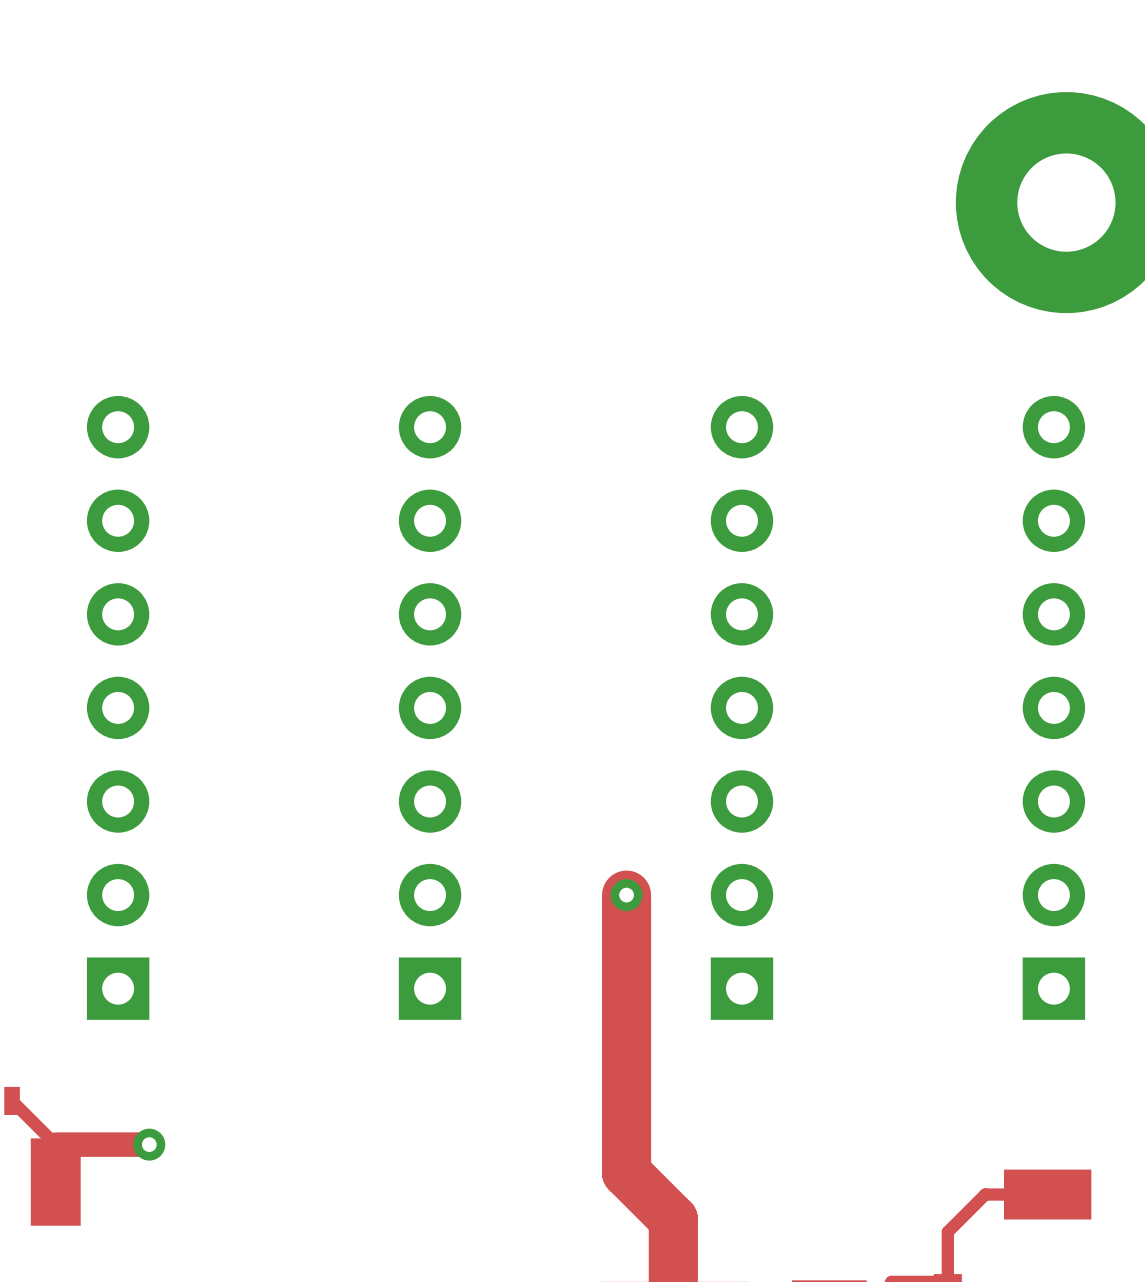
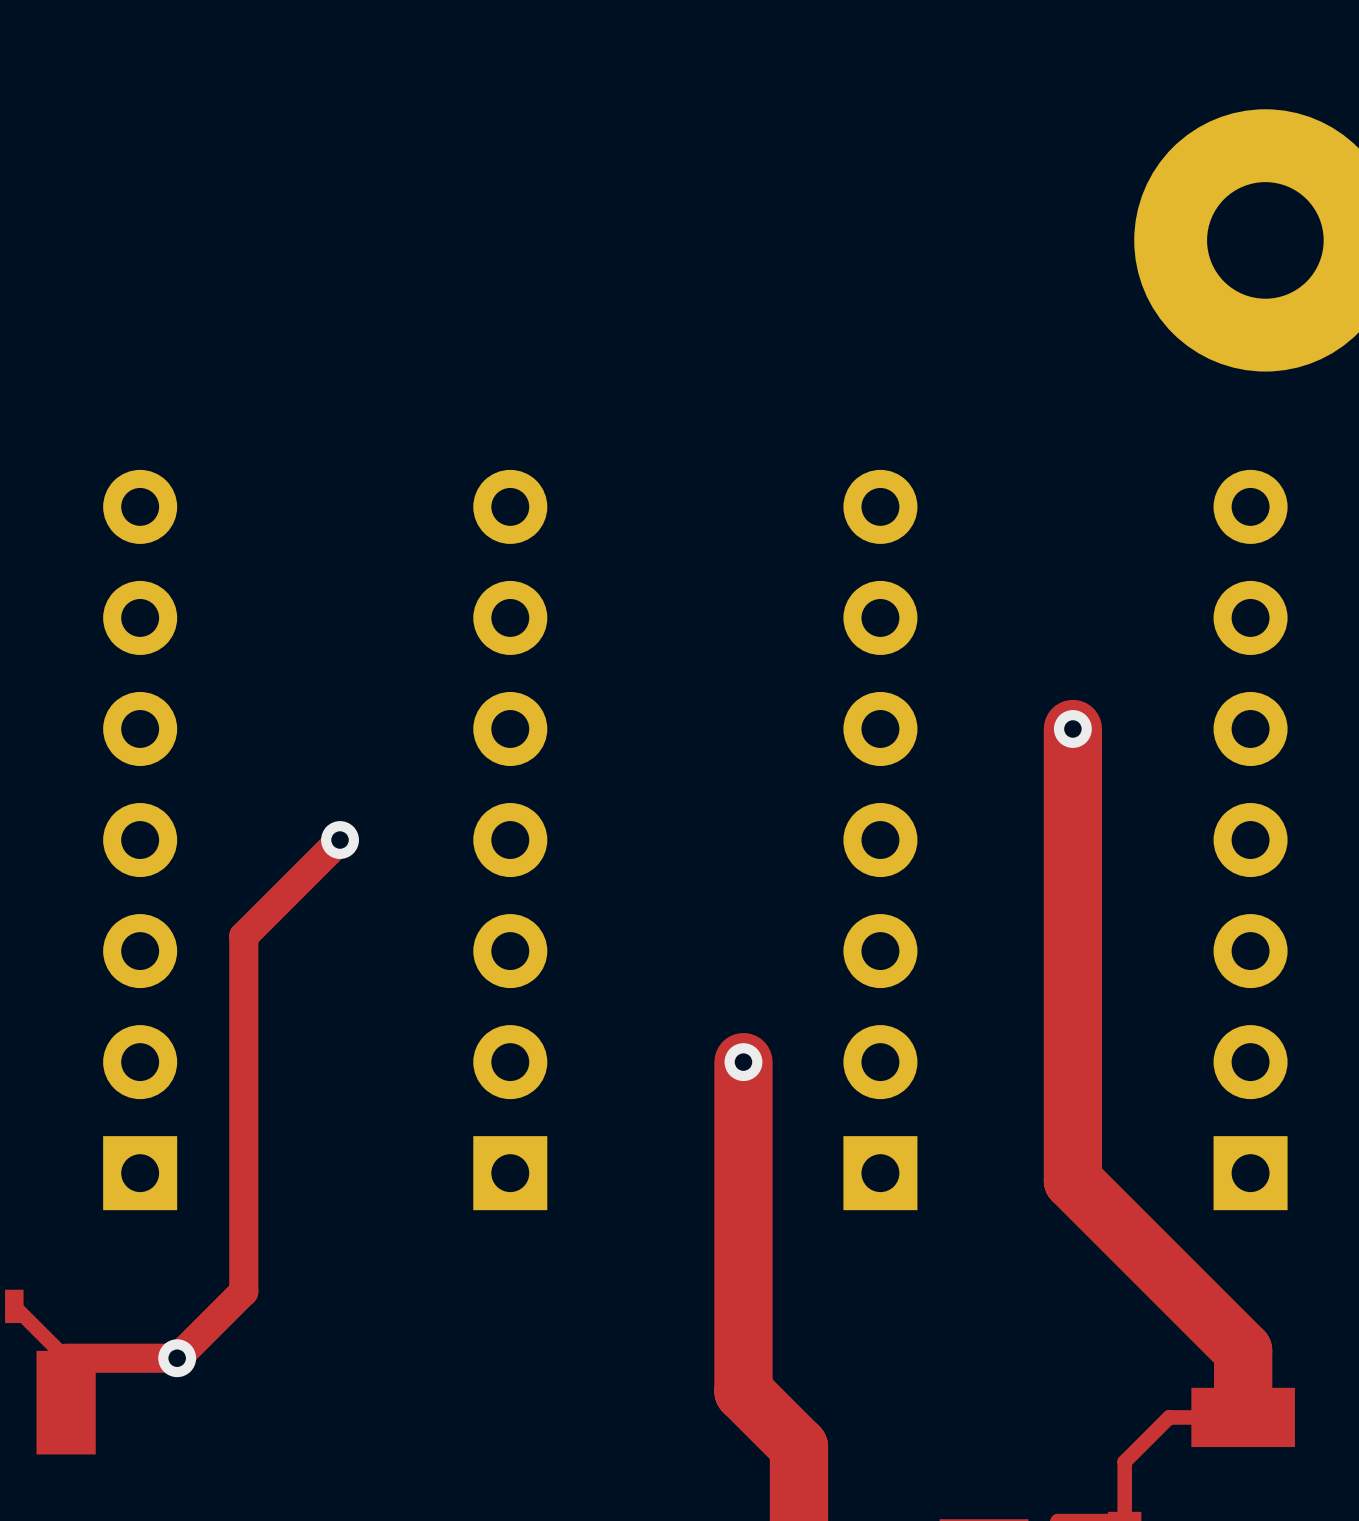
track: none -> (1072, 728) (1072, 1180) (1243, 1350) (1243, 1417)
via: none -> (1072, 728)
track: none -> (340, 840) (243, 936) (243, 1291) (177, 1358)
via: none -> (340, 840)

